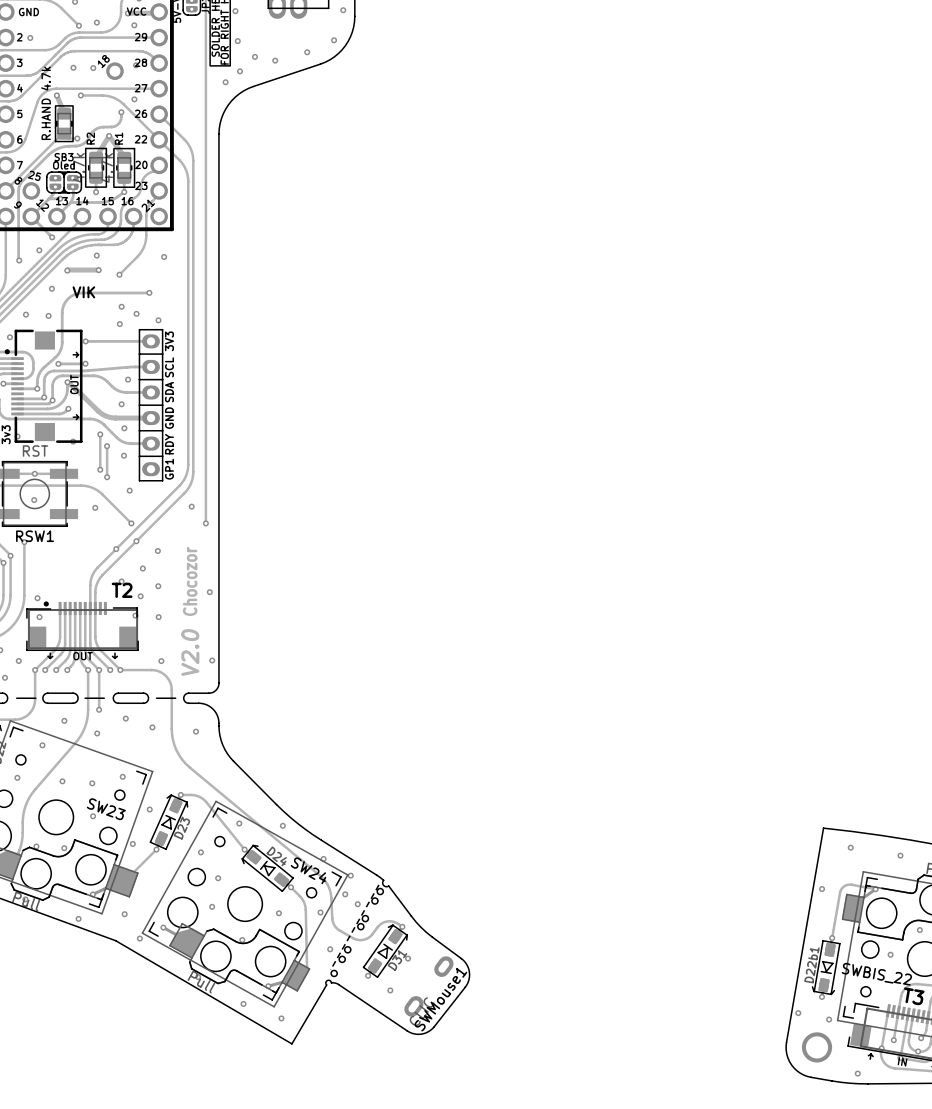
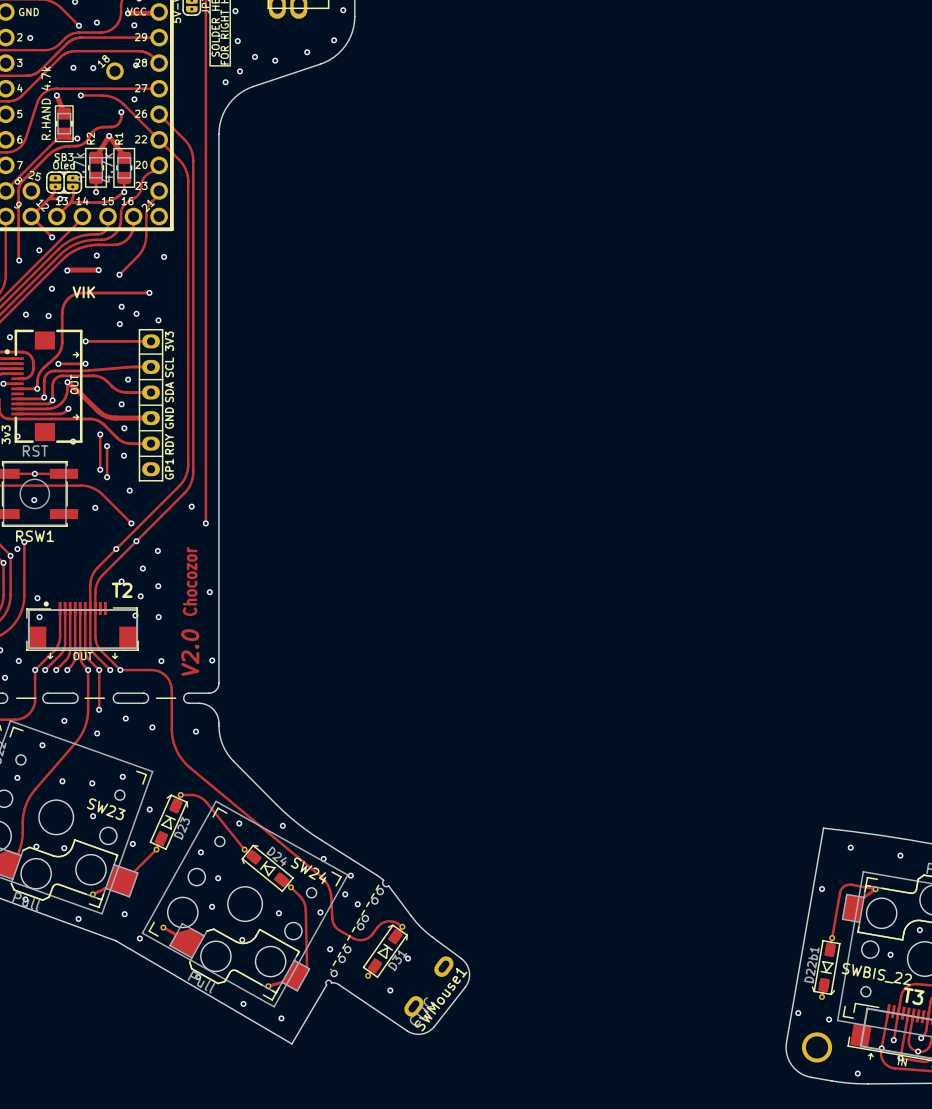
via: none -> (17, 549)

